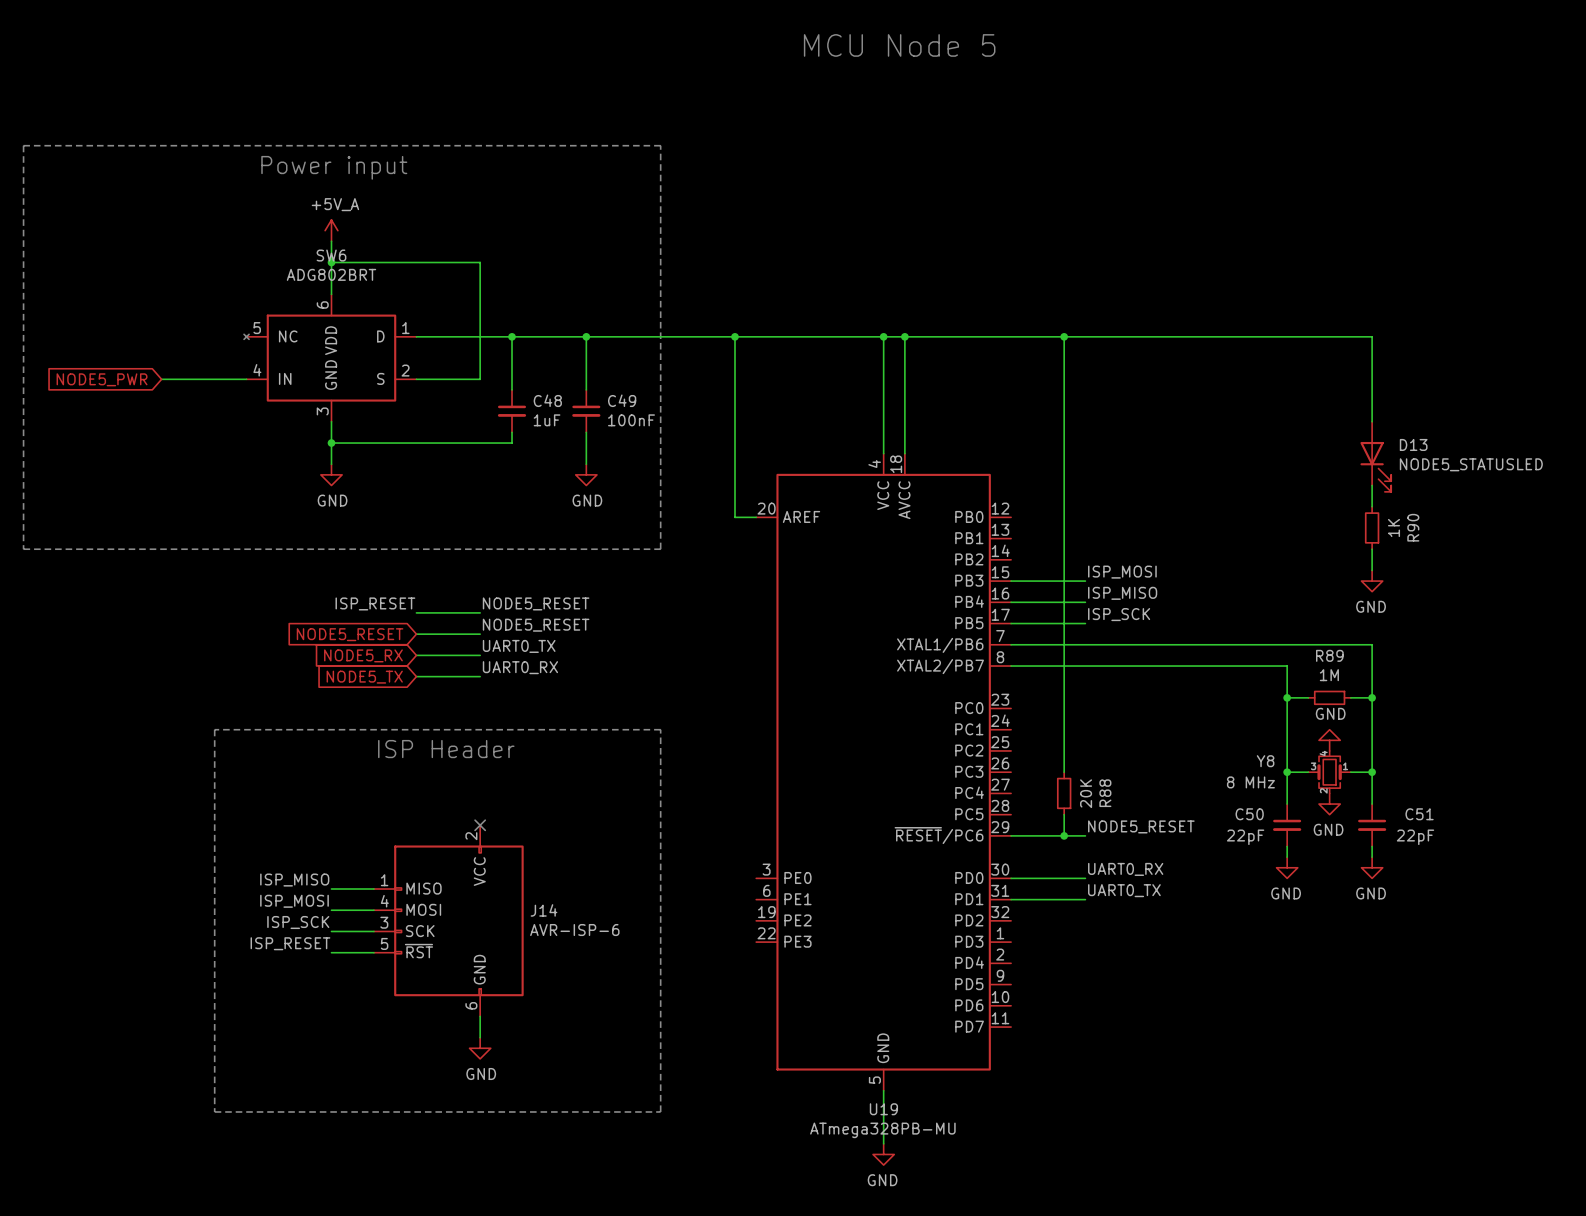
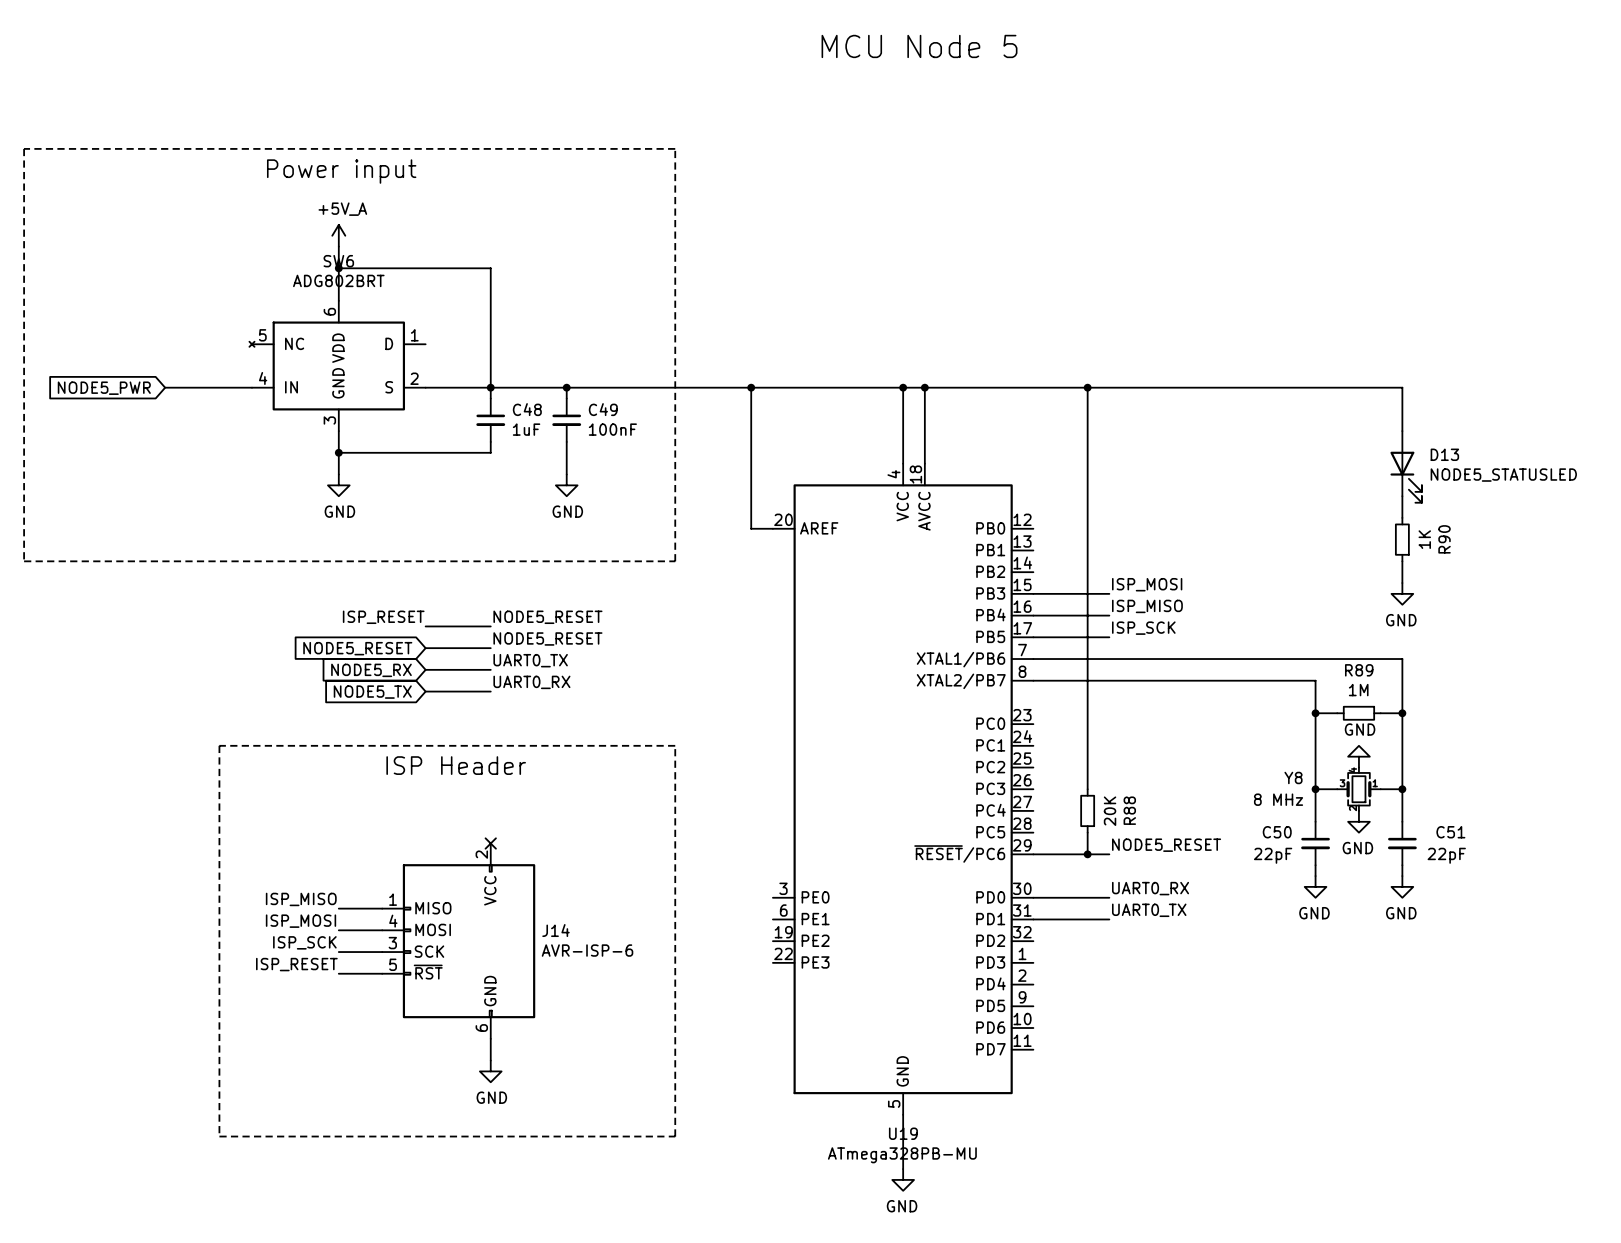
wire: (416, 336) (1372, 336) (1372, 379) -> (490, 398) (490, 387) (1402, 387)
wire: (512, 336) (512, 389) -> none
junction: (512, 336) -> none
wire: (586, 336) (586, 389) -> none
junction: (586, 336) -> none
wire: (734, 336) (734, 379) -> none
junction position: (734, 336) -> (751, 387)
wire: (883, 336) (883, 379) -> none
junction: (883, 336) -> none
wire: (904, 336) (904, 379) -> none
junction: (904, 336) -> none
wire: (1064, 336) (1064, 379) -> none
junction position: (1064, 336) -> (1087, 387)
junction: none -> (490, 387)
wire: none -> (566, 387) (566, 398)
junction: none -> (566, 387)
junction: none -> (903, 387)
junction: none -> (924, 387)
C48 position: (512, 411) -> (490, 420)
C49 position: (586, 411) -> (566, 420)
wire: (512, 432) (512, 443) (480, 443) -> (490, 441) (490, 452)
wire: (586, 432) (586, 464) -> (566, 441) (566, 474)
power symbol position: GND (586, 474) -> GND (566, 485)

